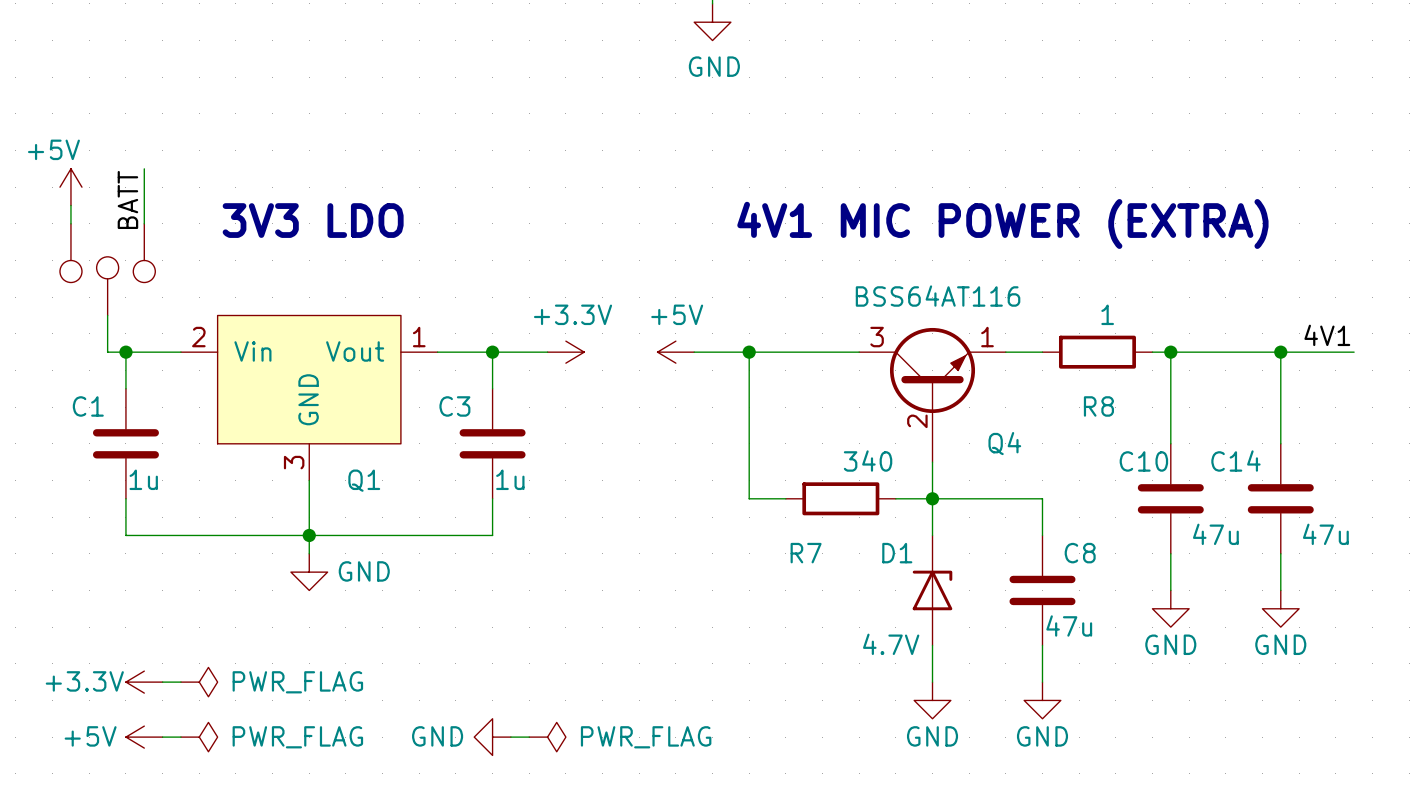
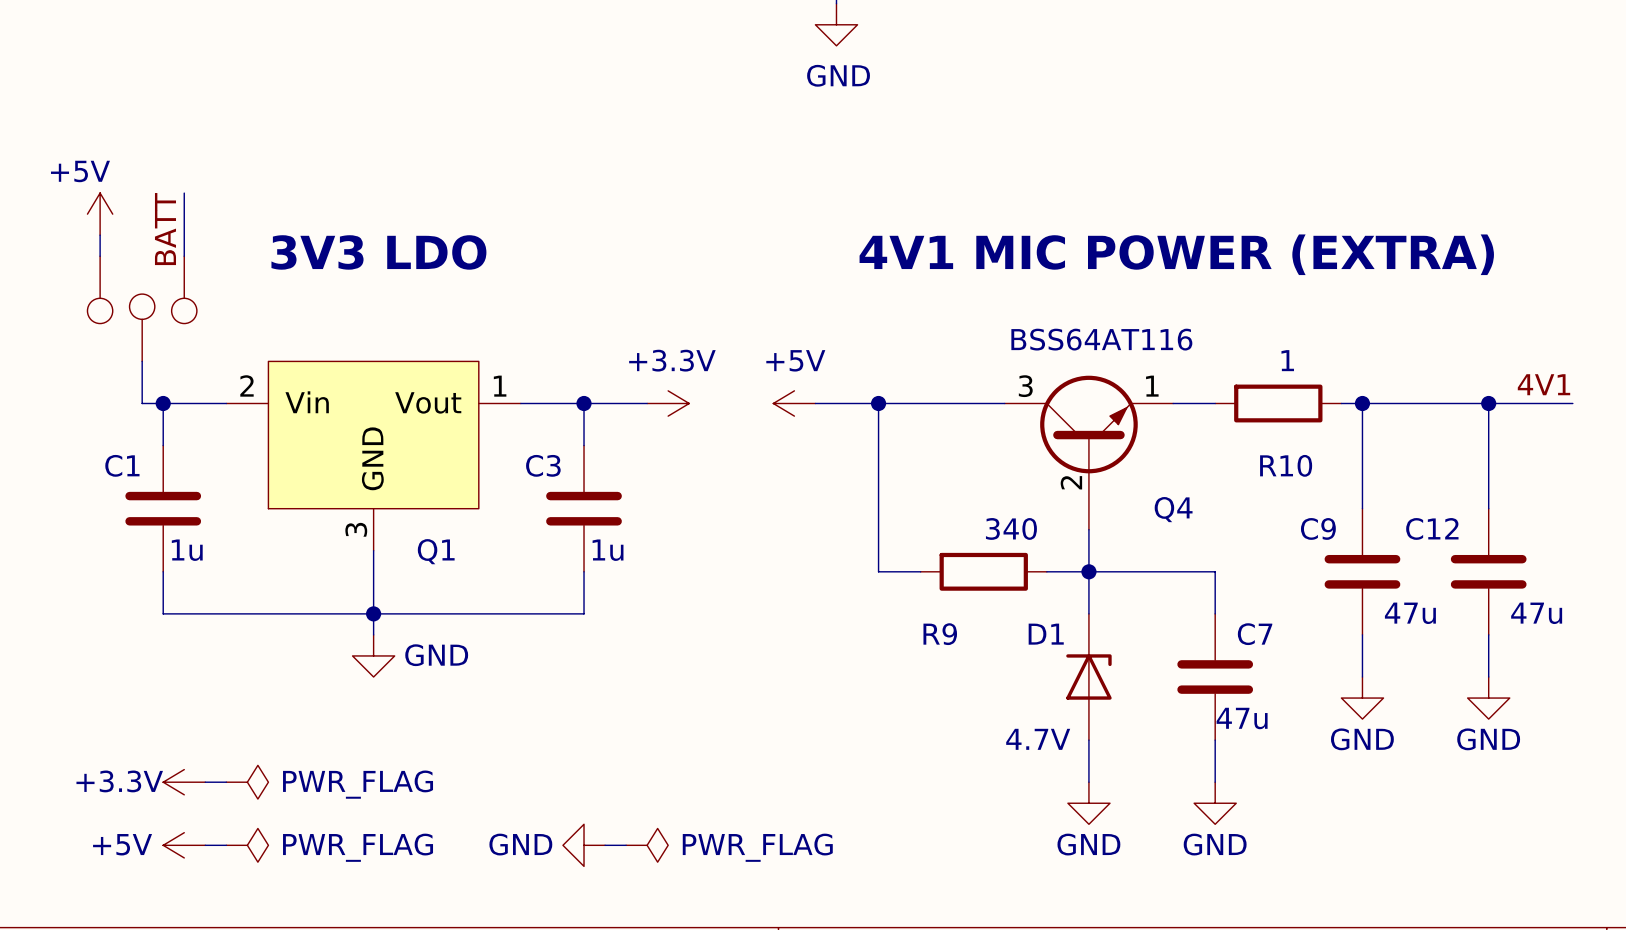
R8 name: R8 (1098, 406) -> R10 (1286, 465)
C10 name: C10 (1143, 461) -> C9 (1318, 528)
C14 name: C14 (1235, 461) -> C12 (1432, 528)
R7 name: R7 (806, 553) -> R9 (940, 634)
C8 name: C8 (1080, 553) -> C7 (1255, 634)

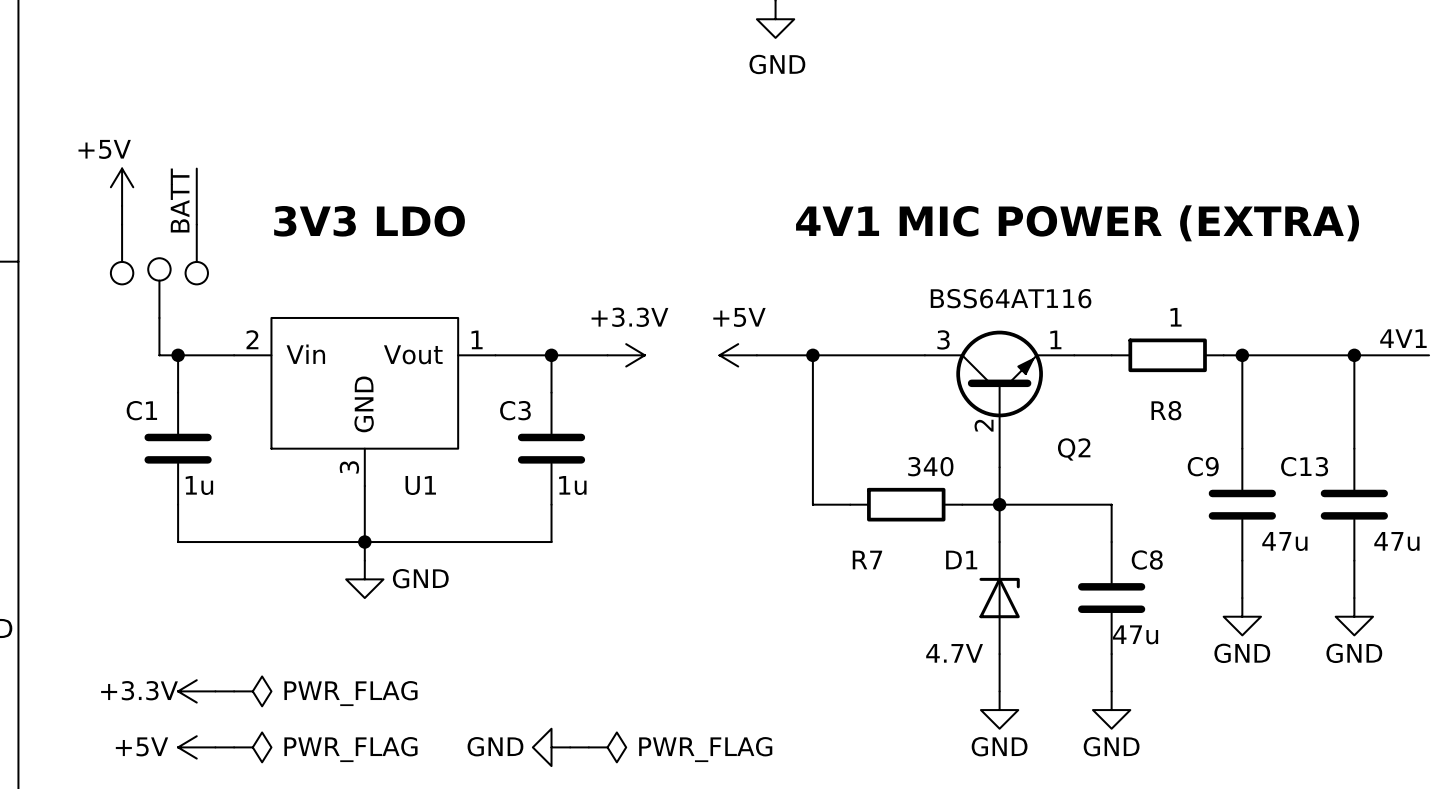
R10 name: R10 (1286, 465) -> R8 (1166, 410)
Q4 name: Q4 (1173, 509) -> Q2 (1074, 449)
C12 name: C12 (1432, 528) -> C13 (1304, 466)
Q1 name: Q1 (436, 551) -> U1 (420, 485)
R9 name: R9 (940, 634) -> R7 (867, 560)
C7 name: C7 (1255, 634) -> C8 (1147, 560)

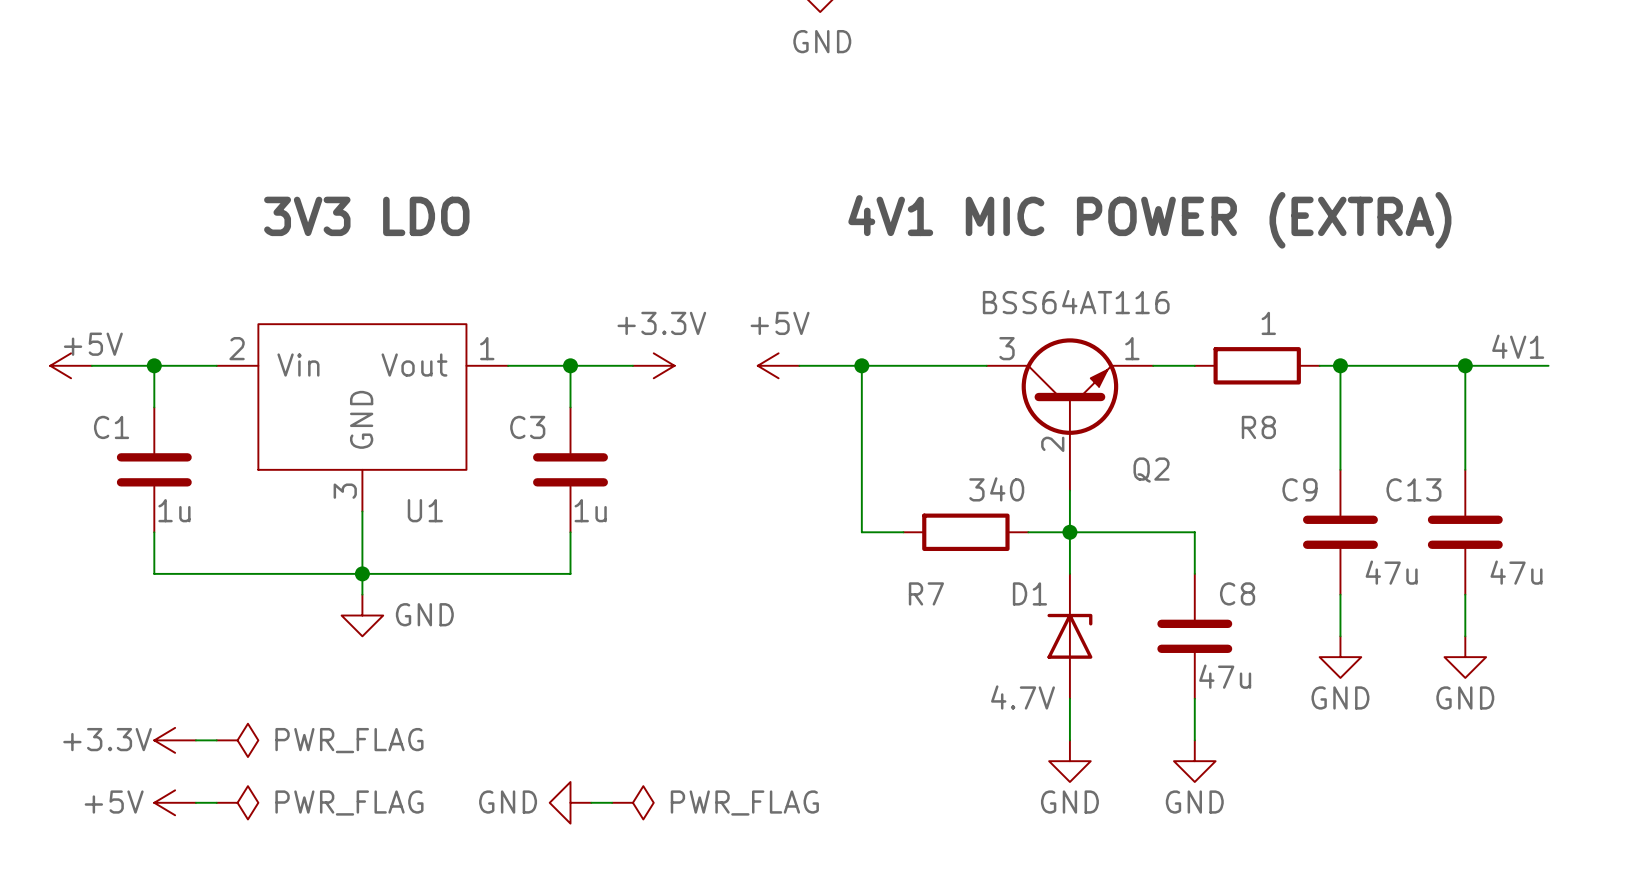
power symbol text position: +5V (104, 149) -> +5V (93, 344)
wire: (196, 168) (196, 224) -> none
power symbol rotation: 0° (122, 187) -> 90° counterclockwise (71, 365)
power symbol position: +5V (122, 187) -> +5V (71, 365)
label: BATT (180, 200) -> none
wire: (122, 205) (122, 224) -> none
part: (122, 254) -> none
part: (196, 254) -> none
part: (159, 288) -> none
wire: (159, 317) (159, 355) -> (91, 365) (133, 365)

